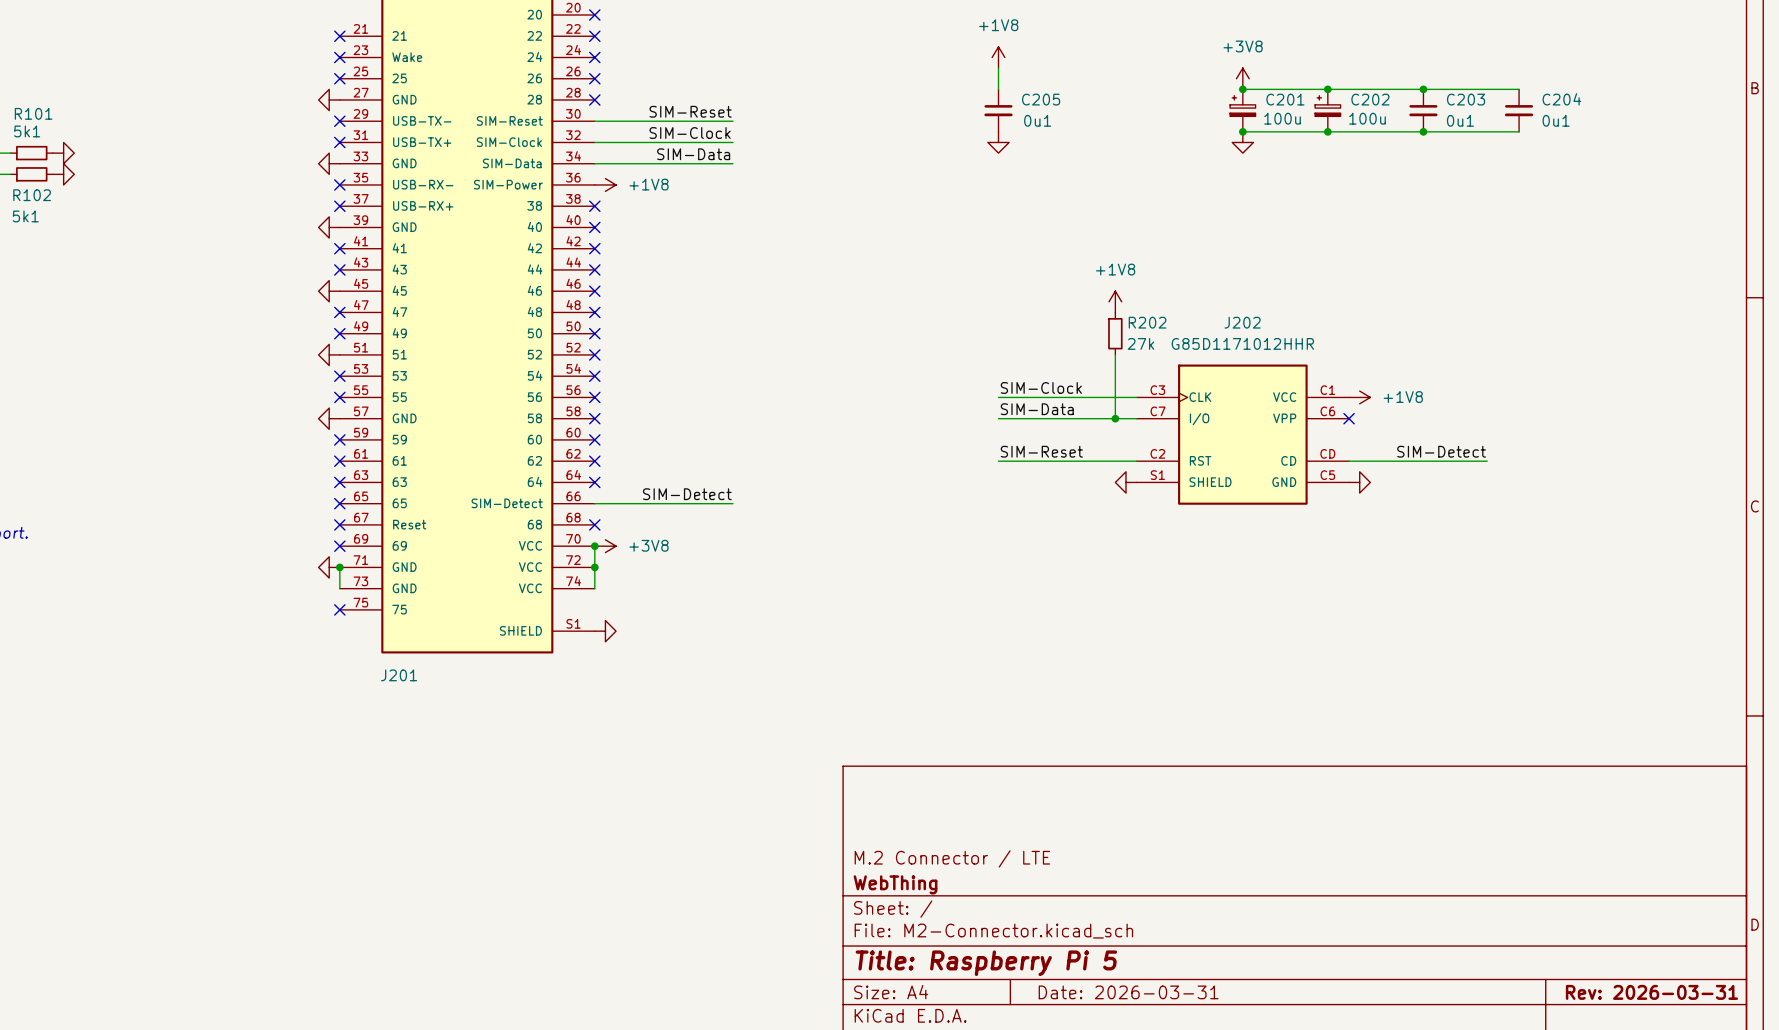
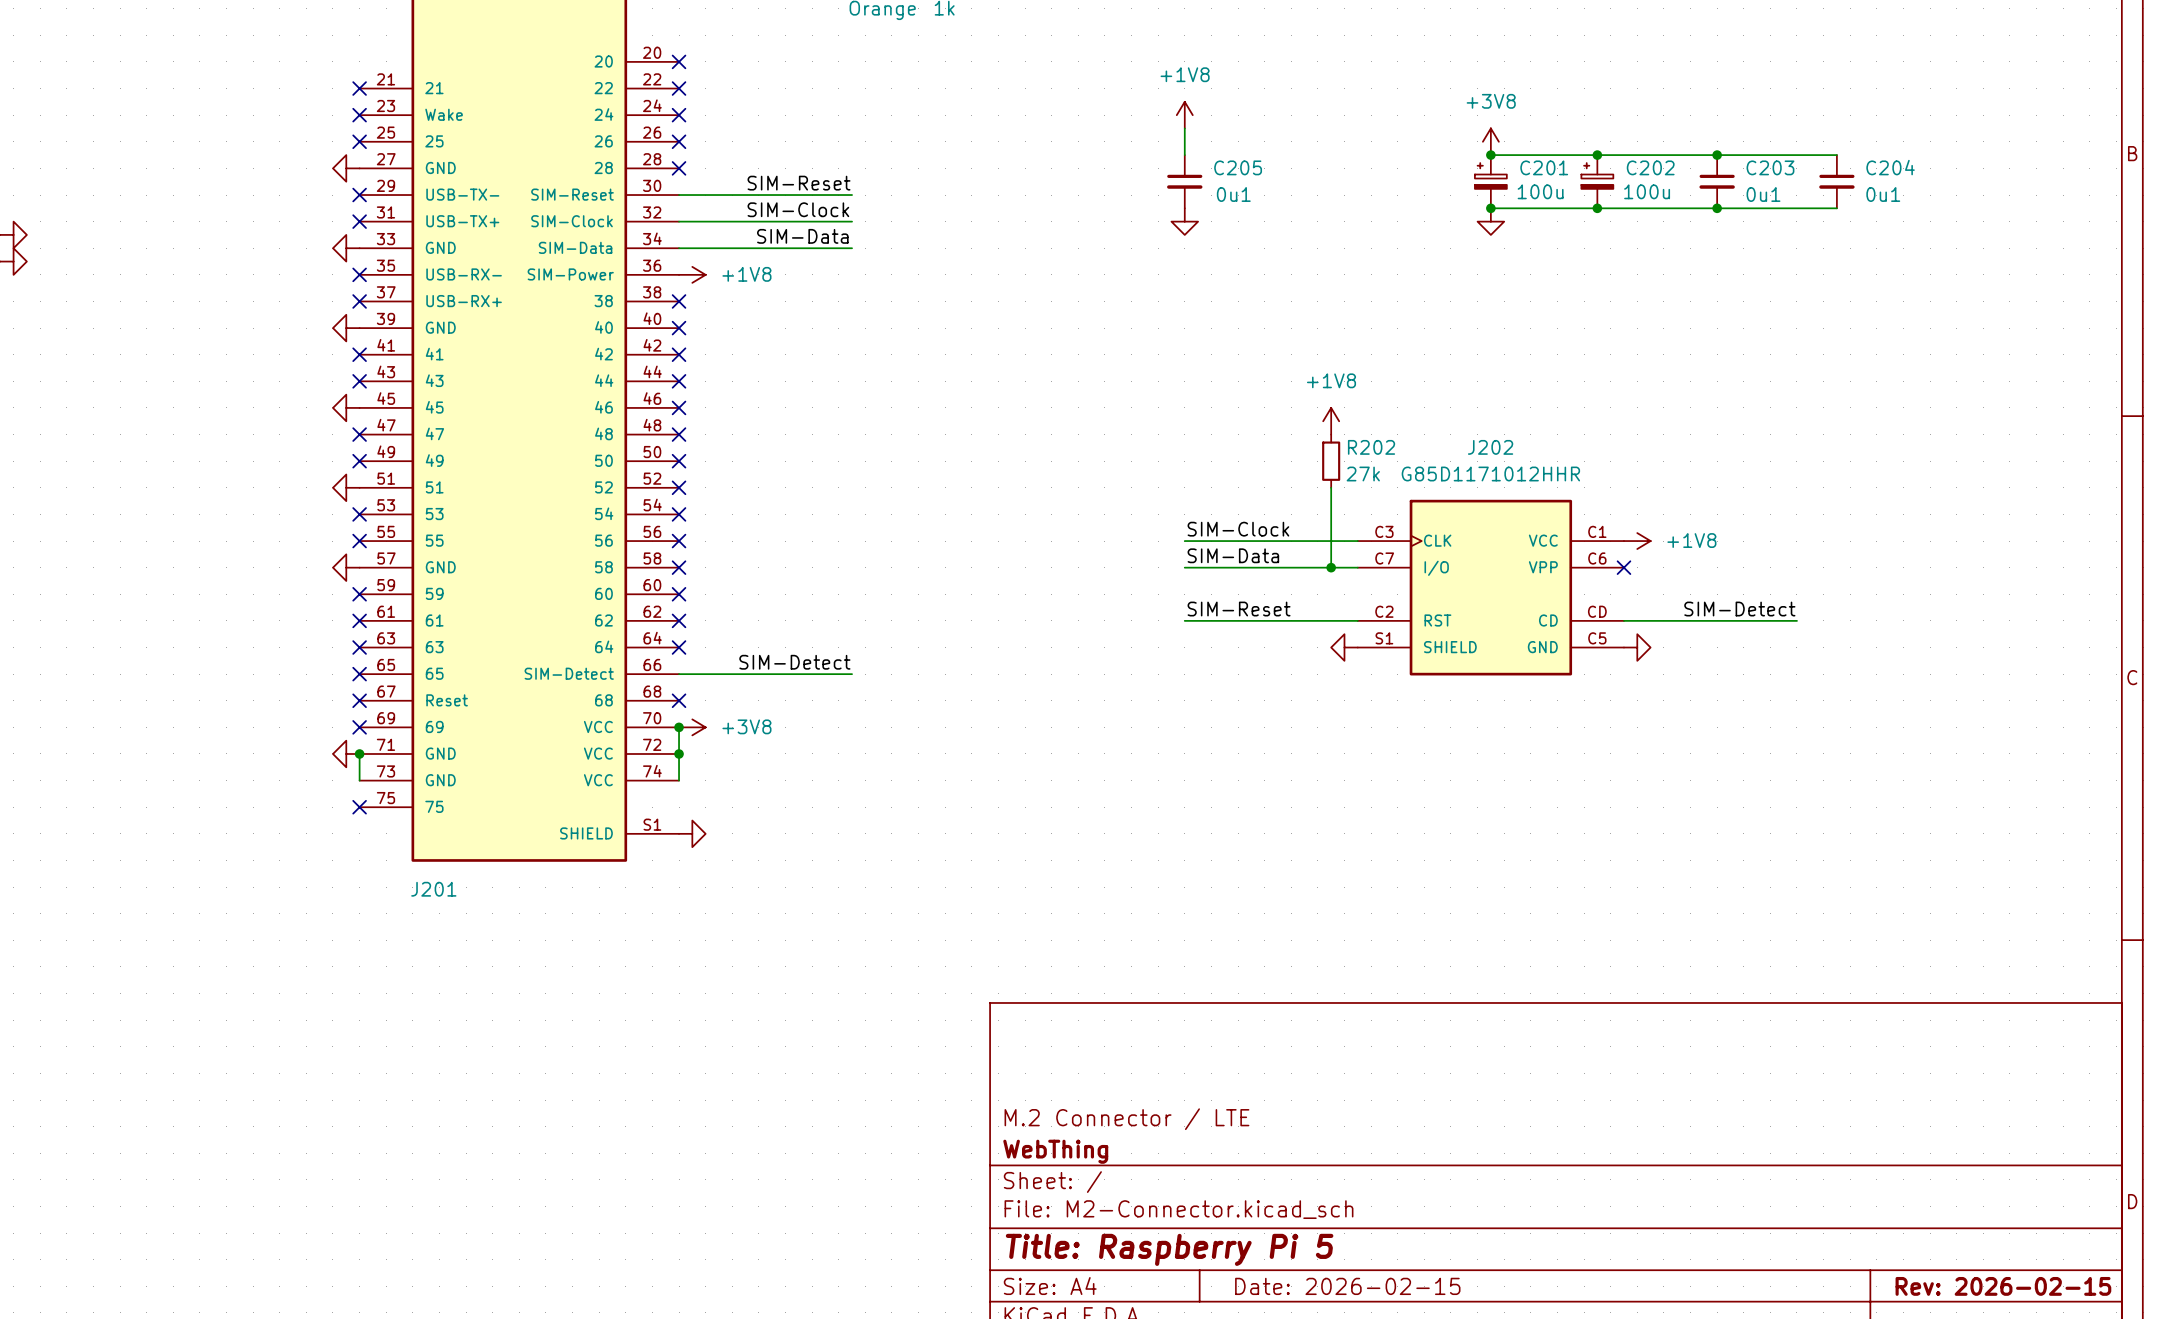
title block: Date: 2026-03-31 (1128, 992) -> Date: 2026-02-15 (1347, 1286)
title block: Rev: 2026-03-31 (1651, 992) -> Rev: 2026-02-15 (2003, 1286)

